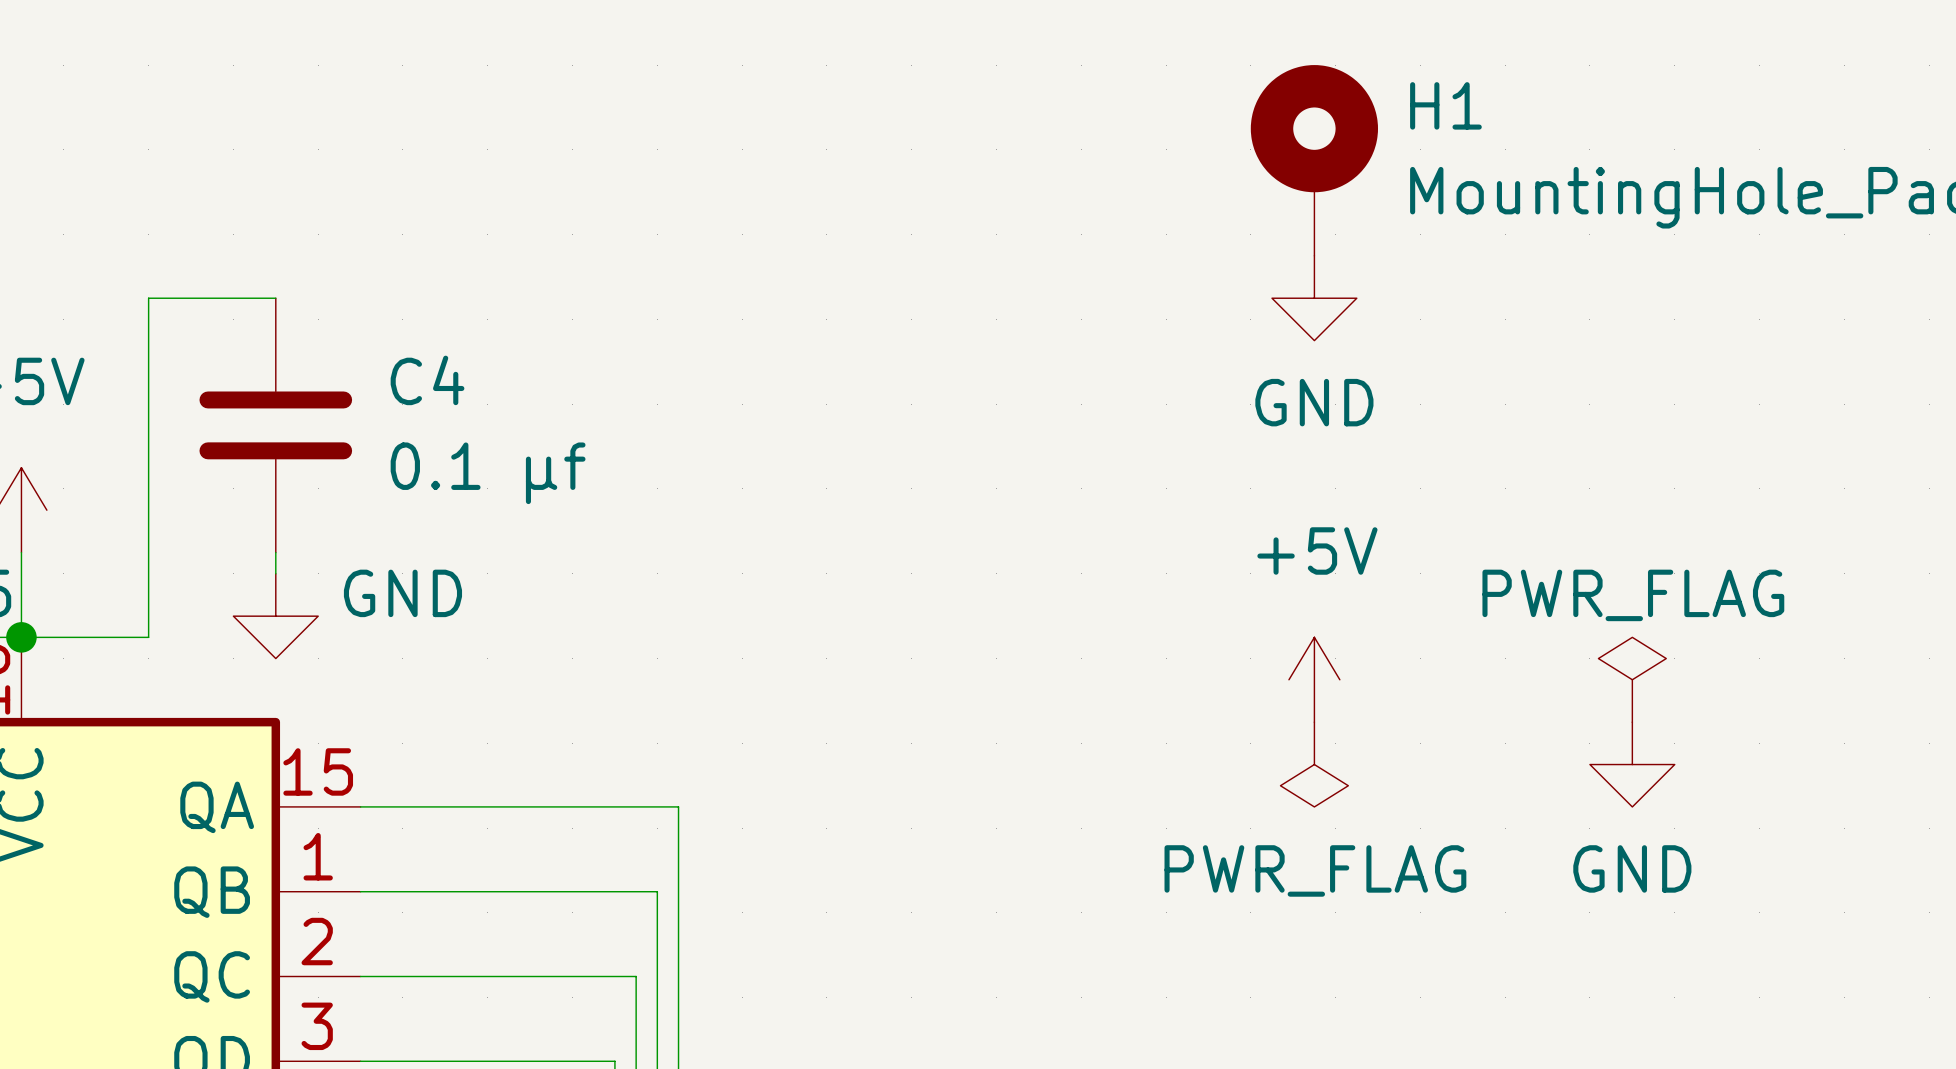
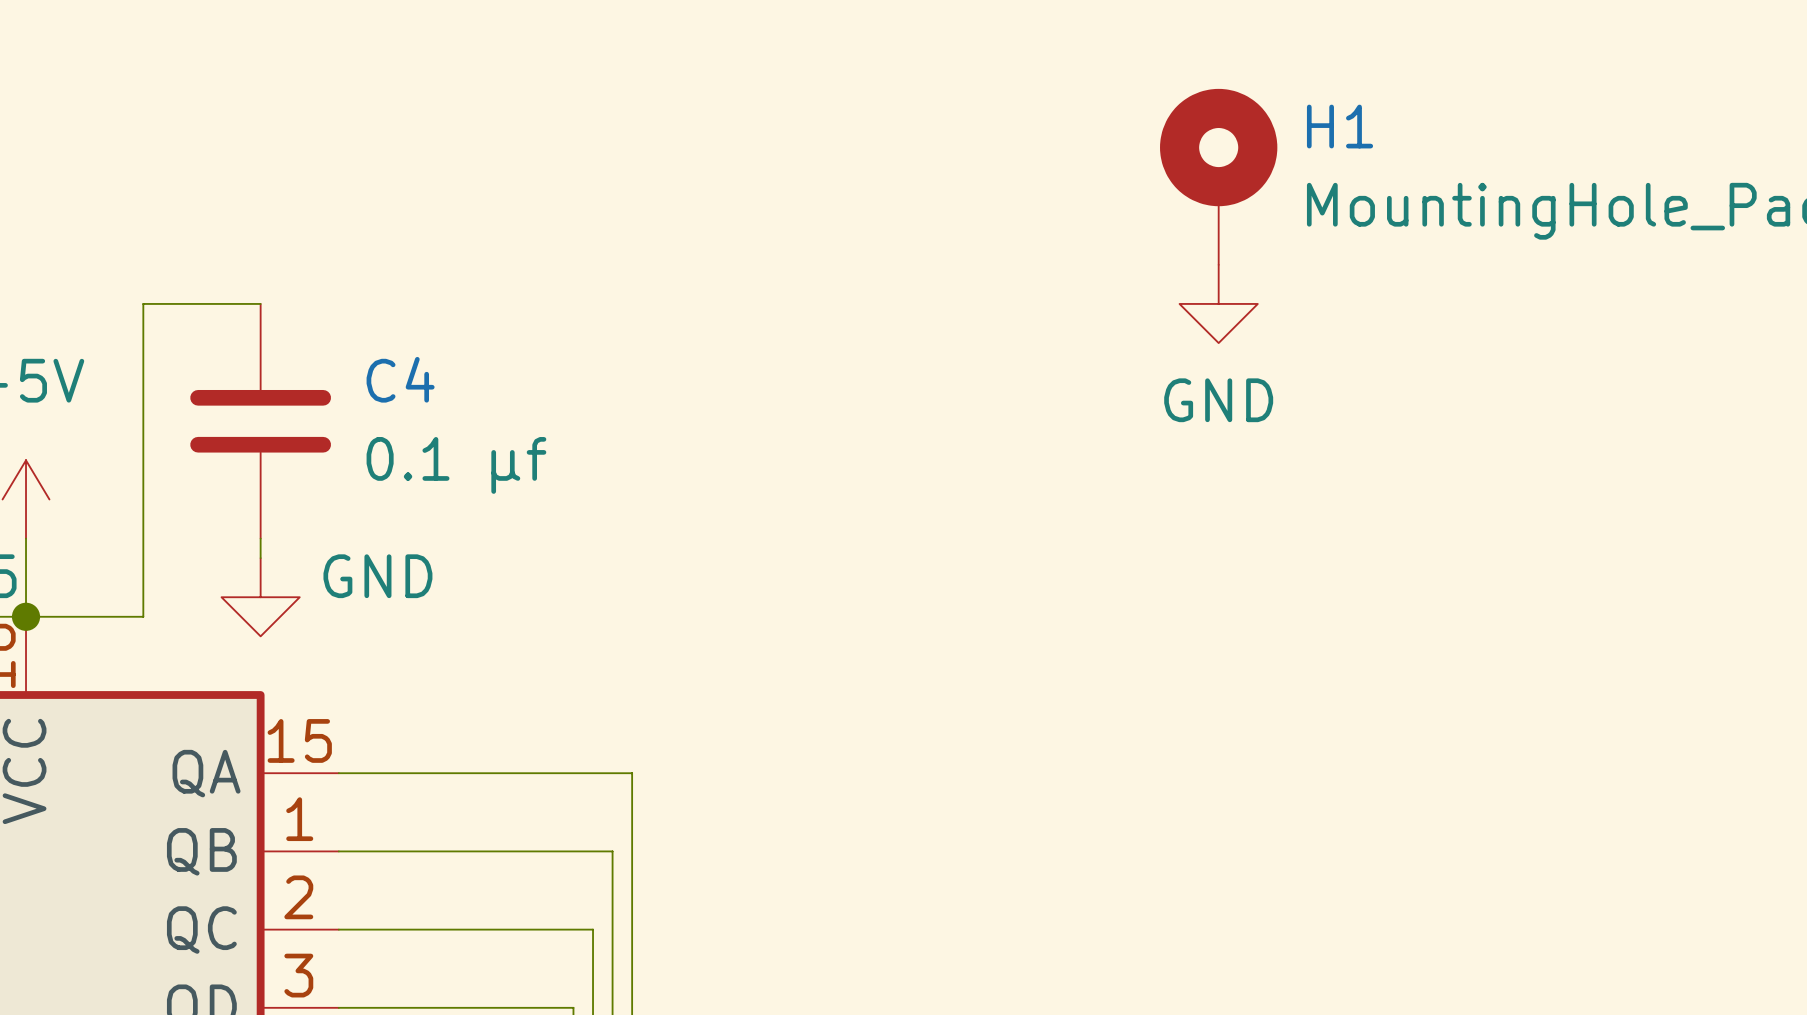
power symbol: +5V (1314, 679) -> none
power symbol: PWR_FLAG (1632, 679) -> none
power symbol: PWR_FLAG (1314, 764) -> none
power symbol: GND (1632, 764) -> none

